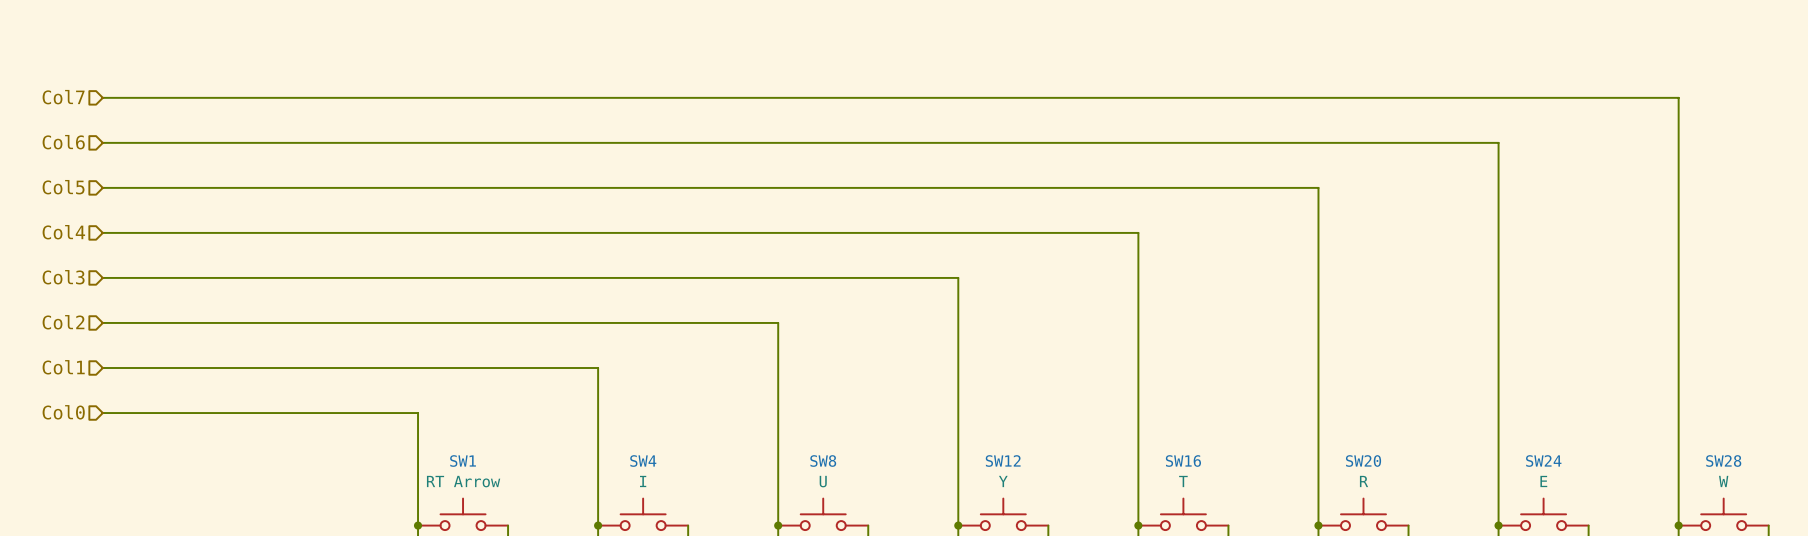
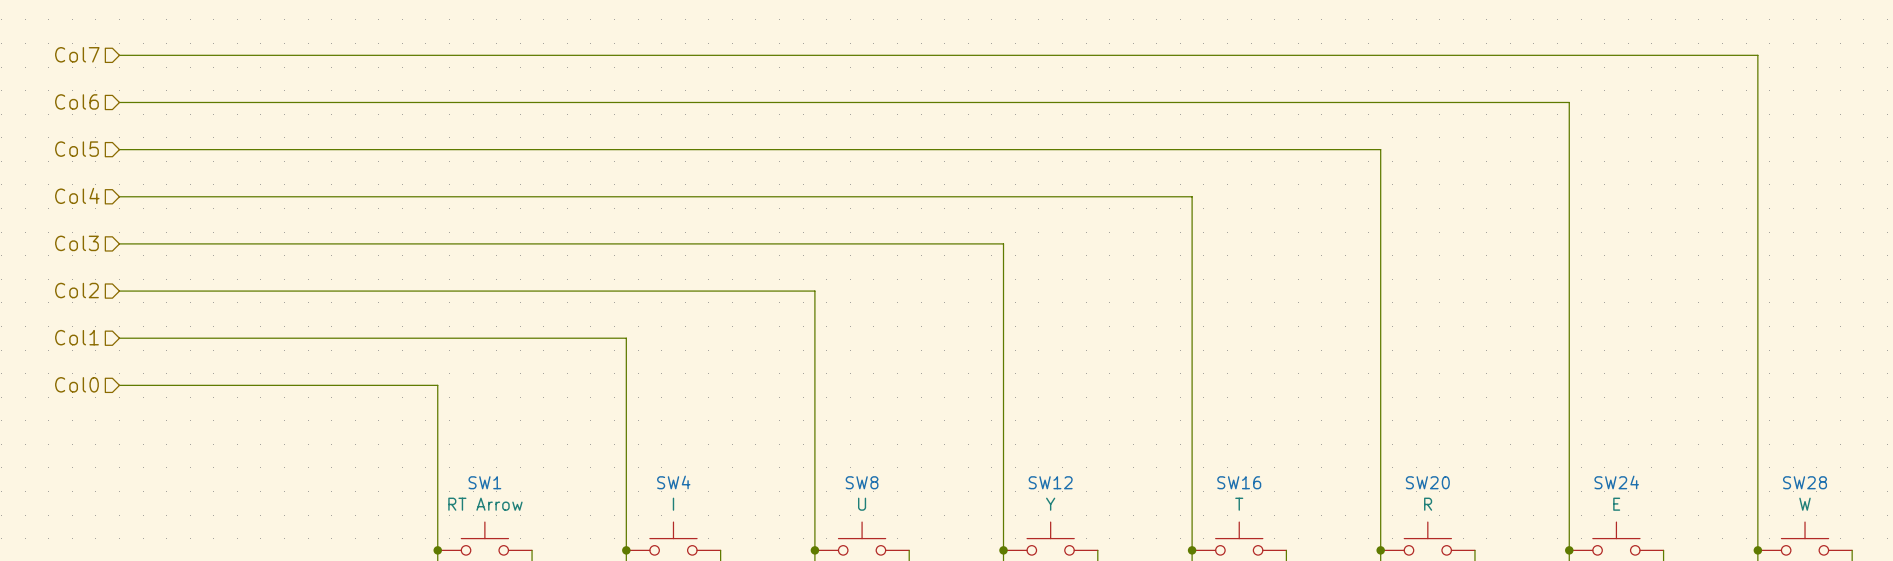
hierarchical label position: Col7 (63, 97) -> Col7 (77, 54)
wire: (102, 97) (114, 97) -> none
wire: (1498, 97) (1678, 97) -> (119, 55) (1757, 55) (1757, 102)
hierarchical label position: Col6 (63, 142) -> Col6 (76, 101)
wire: (102, 142) (114, 142) -> none
wire: (1318, 142) (1498, 142) -> (1569, 102) (1569, 149)
hierarchical label position: Col5 (63, 187) -> Col5 (76, 149)
wire: (102, 187) (114, 187) -> none
wire: (1138, 187) (1318, 187) -> (1380, 149) (1380, 196)
wire: none -> (1192, 196) (1192, 243)
hierarchical label position: Col4 (63, 232) -> Col4 (77, 195)
wire: (102, 232) (114, 232) -> none
wire: (958, 232) (1138, 232) -> (1003, 243) (1003, 291)
hierarchical label position: Col3 (63, 277) -> Col3 (76, 243)
wire: (102, 277) (114, 277) -> none
wire: (778, 277) (958, 277) -> none
hierarchical label position: Col2 (63, 322) -> Col2 (76, 290)
wire: (102, 322) (114, 322) -> none
wire: (598, 322) (778, 322) -> (814, 291) (814, 338)
hierarchical label position: Col1 (63, 367) -> Col1 (76, 337)
wire: (102, 367) (114, 367) -> none
wire: (418, 367) (598, 367) -> (626, 338) (626, 385)
hierarchical label position: Col0 (63, 412) -> Col0 (76, 384)
wire: (102, 413) (418, 413) -> (437, 385) (437, 432)

